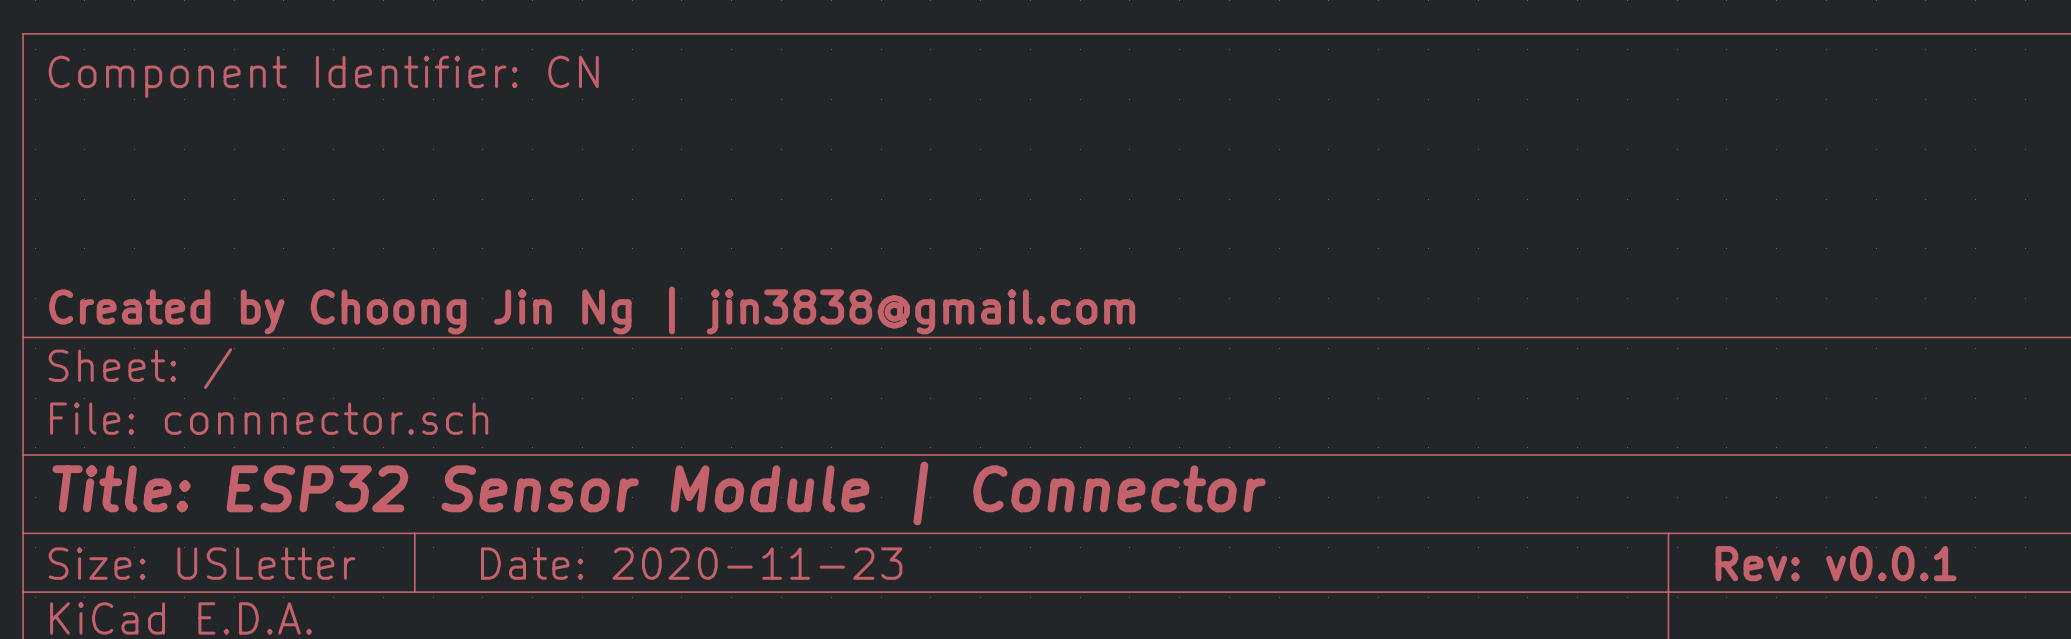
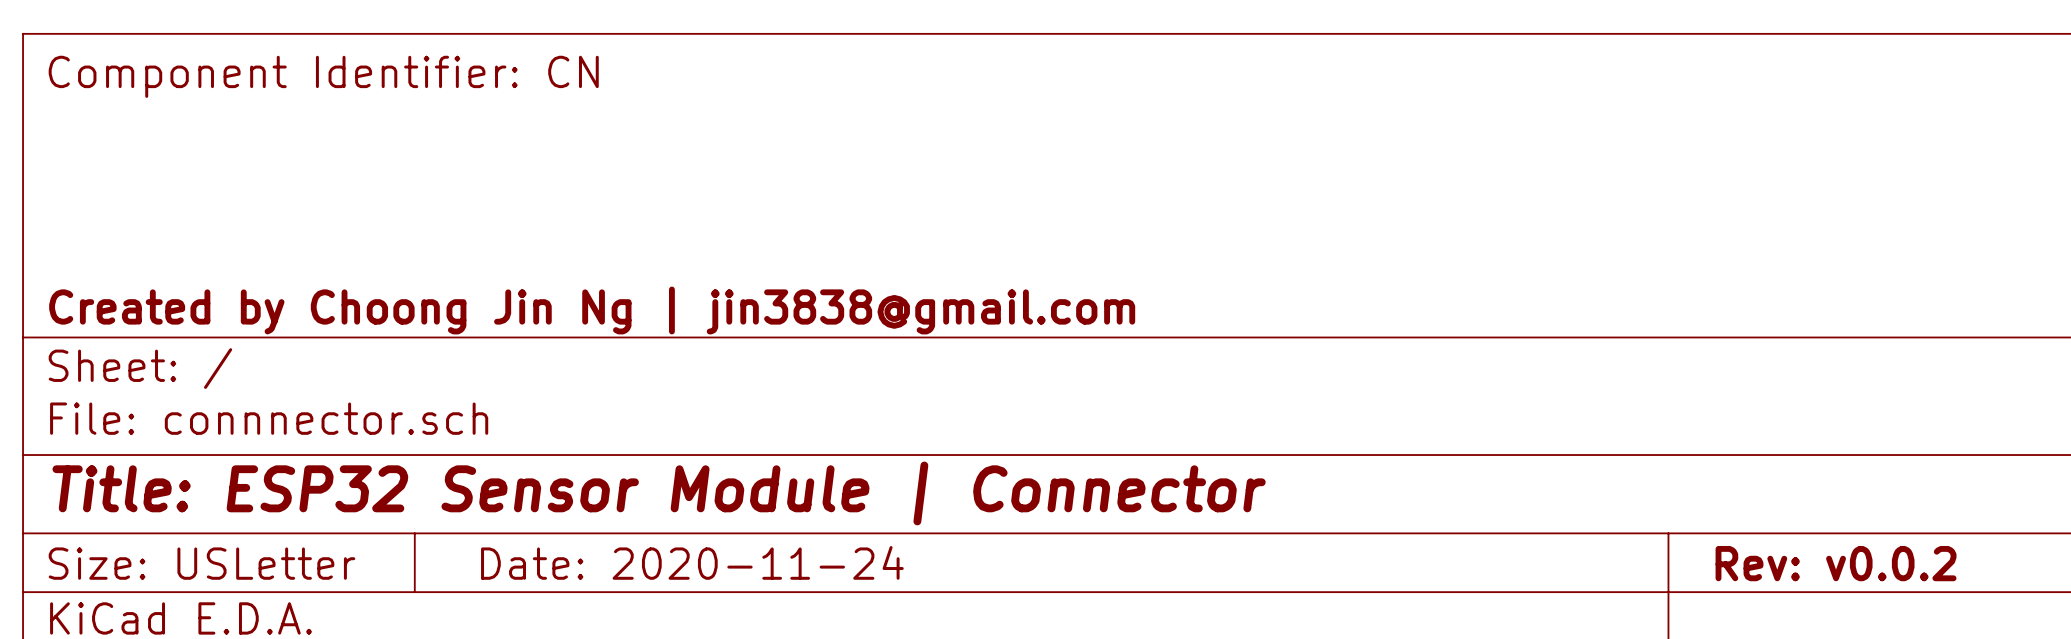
title block: Date: 2020-11-23 (691, 563) -> Date: 2020-11-24 (692, 562)
title block: Rev: v0.0.1 (1836, 563) -> Rev: v0.0.2 (1836, 563)

